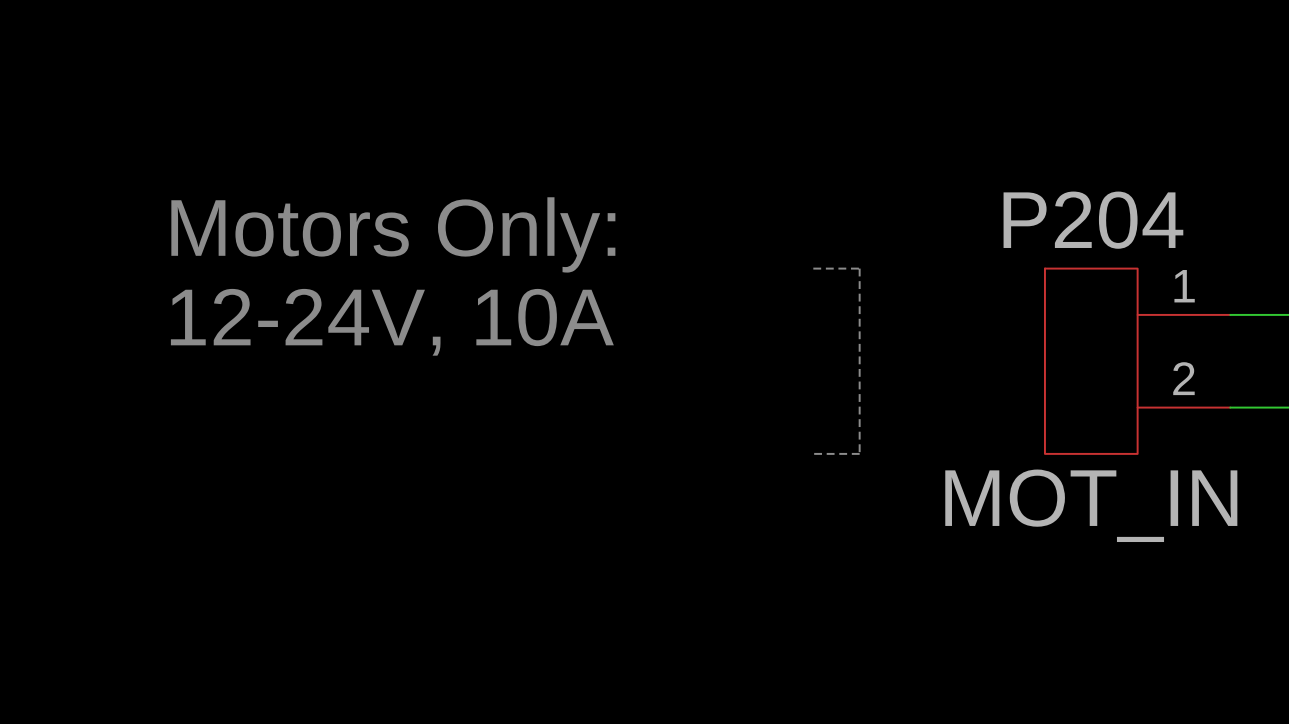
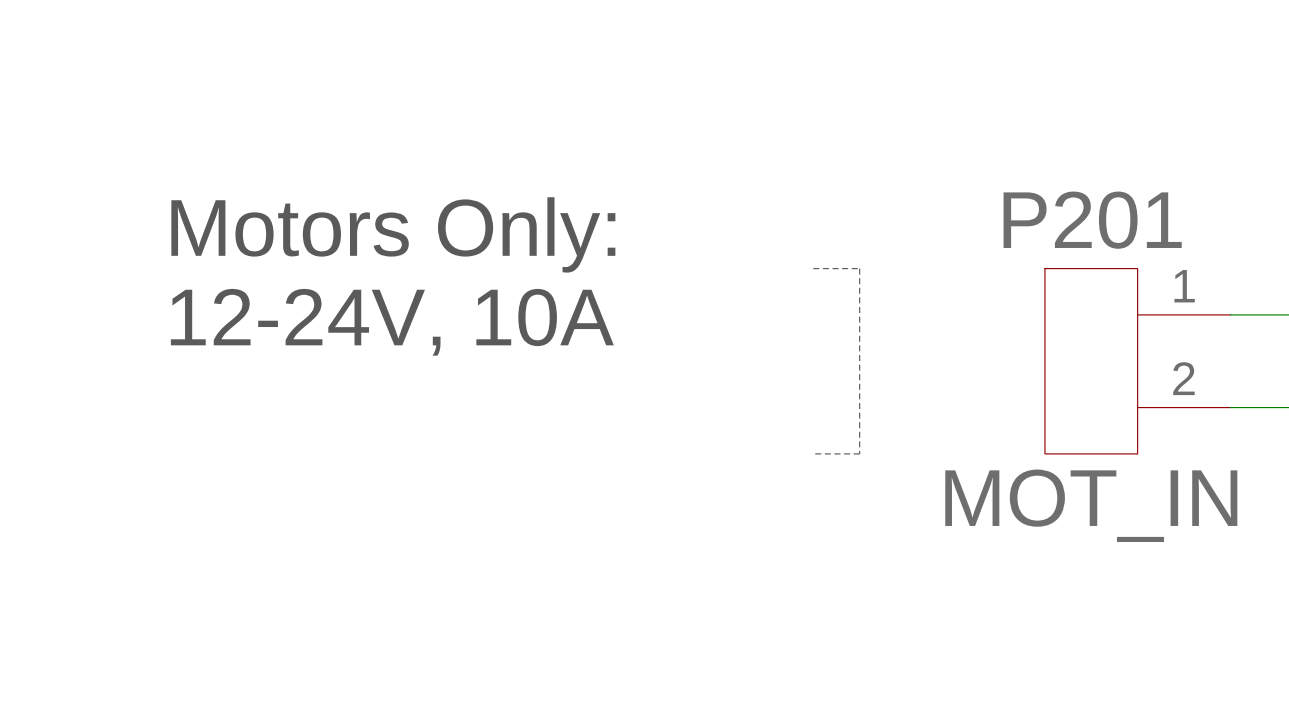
P204 name: P204 (1093, 220) -> P201 (1092, 220)

